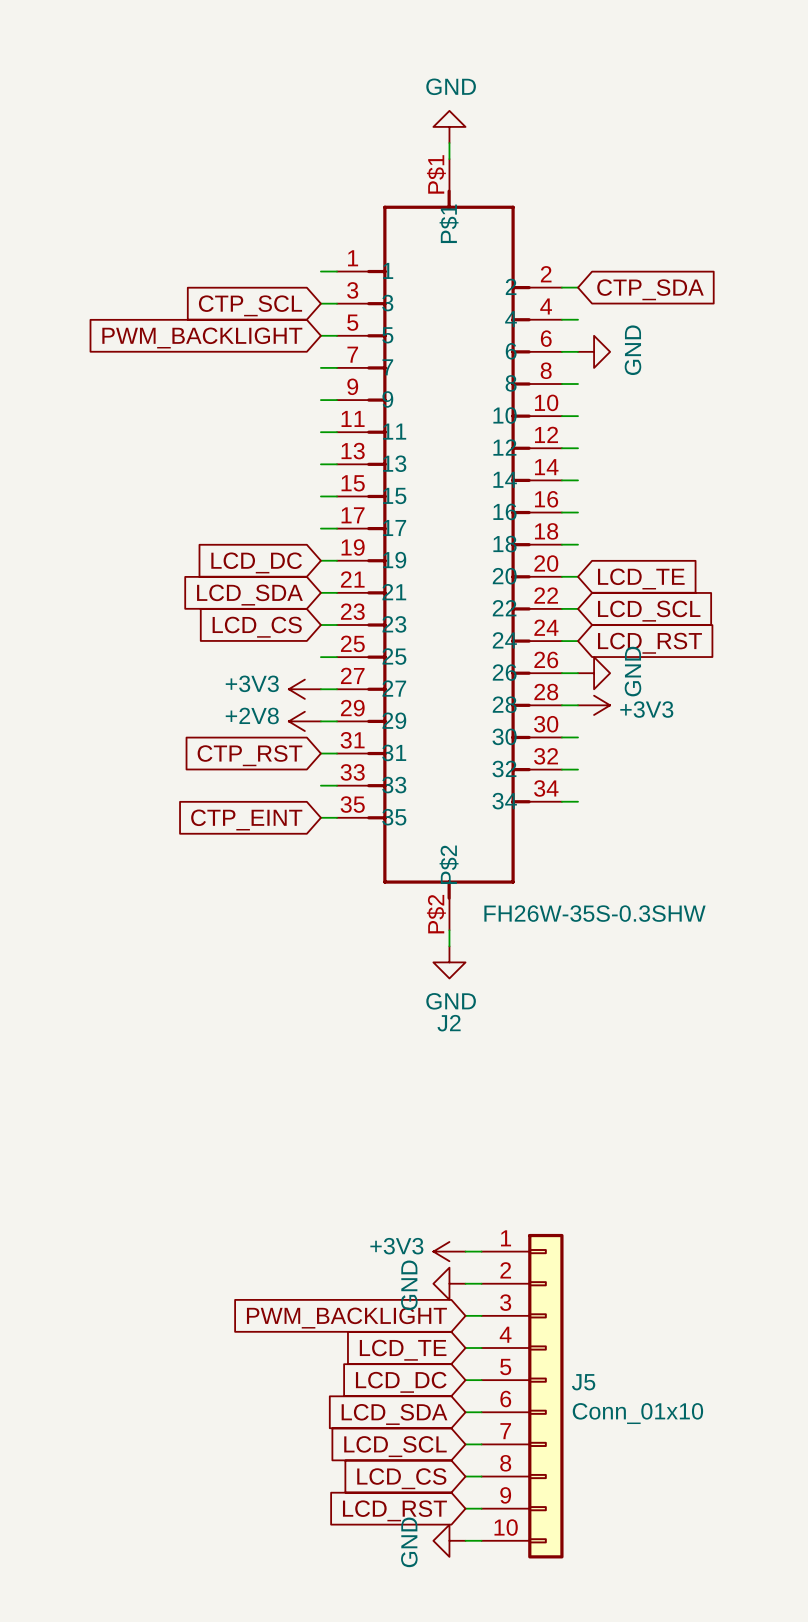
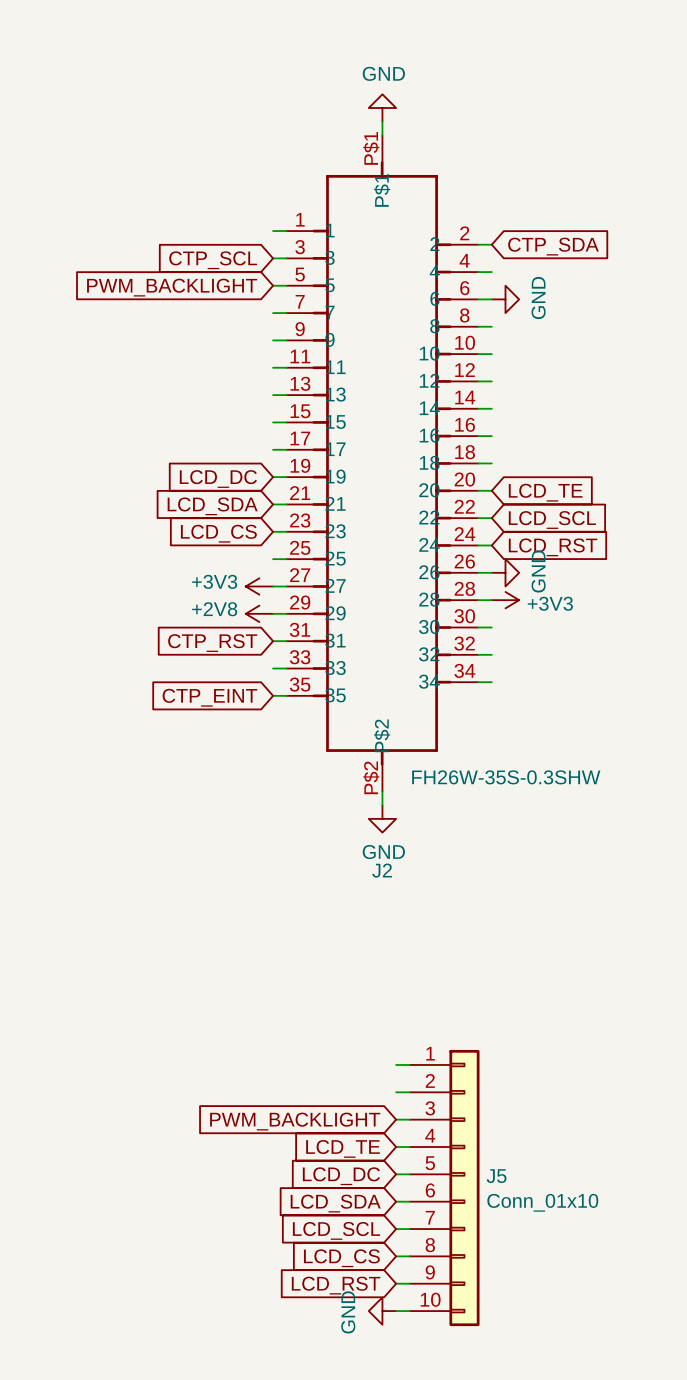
power symbol: +3V3 (449, 1251) -> none
power symbol: GND (449, 1283) -> none

